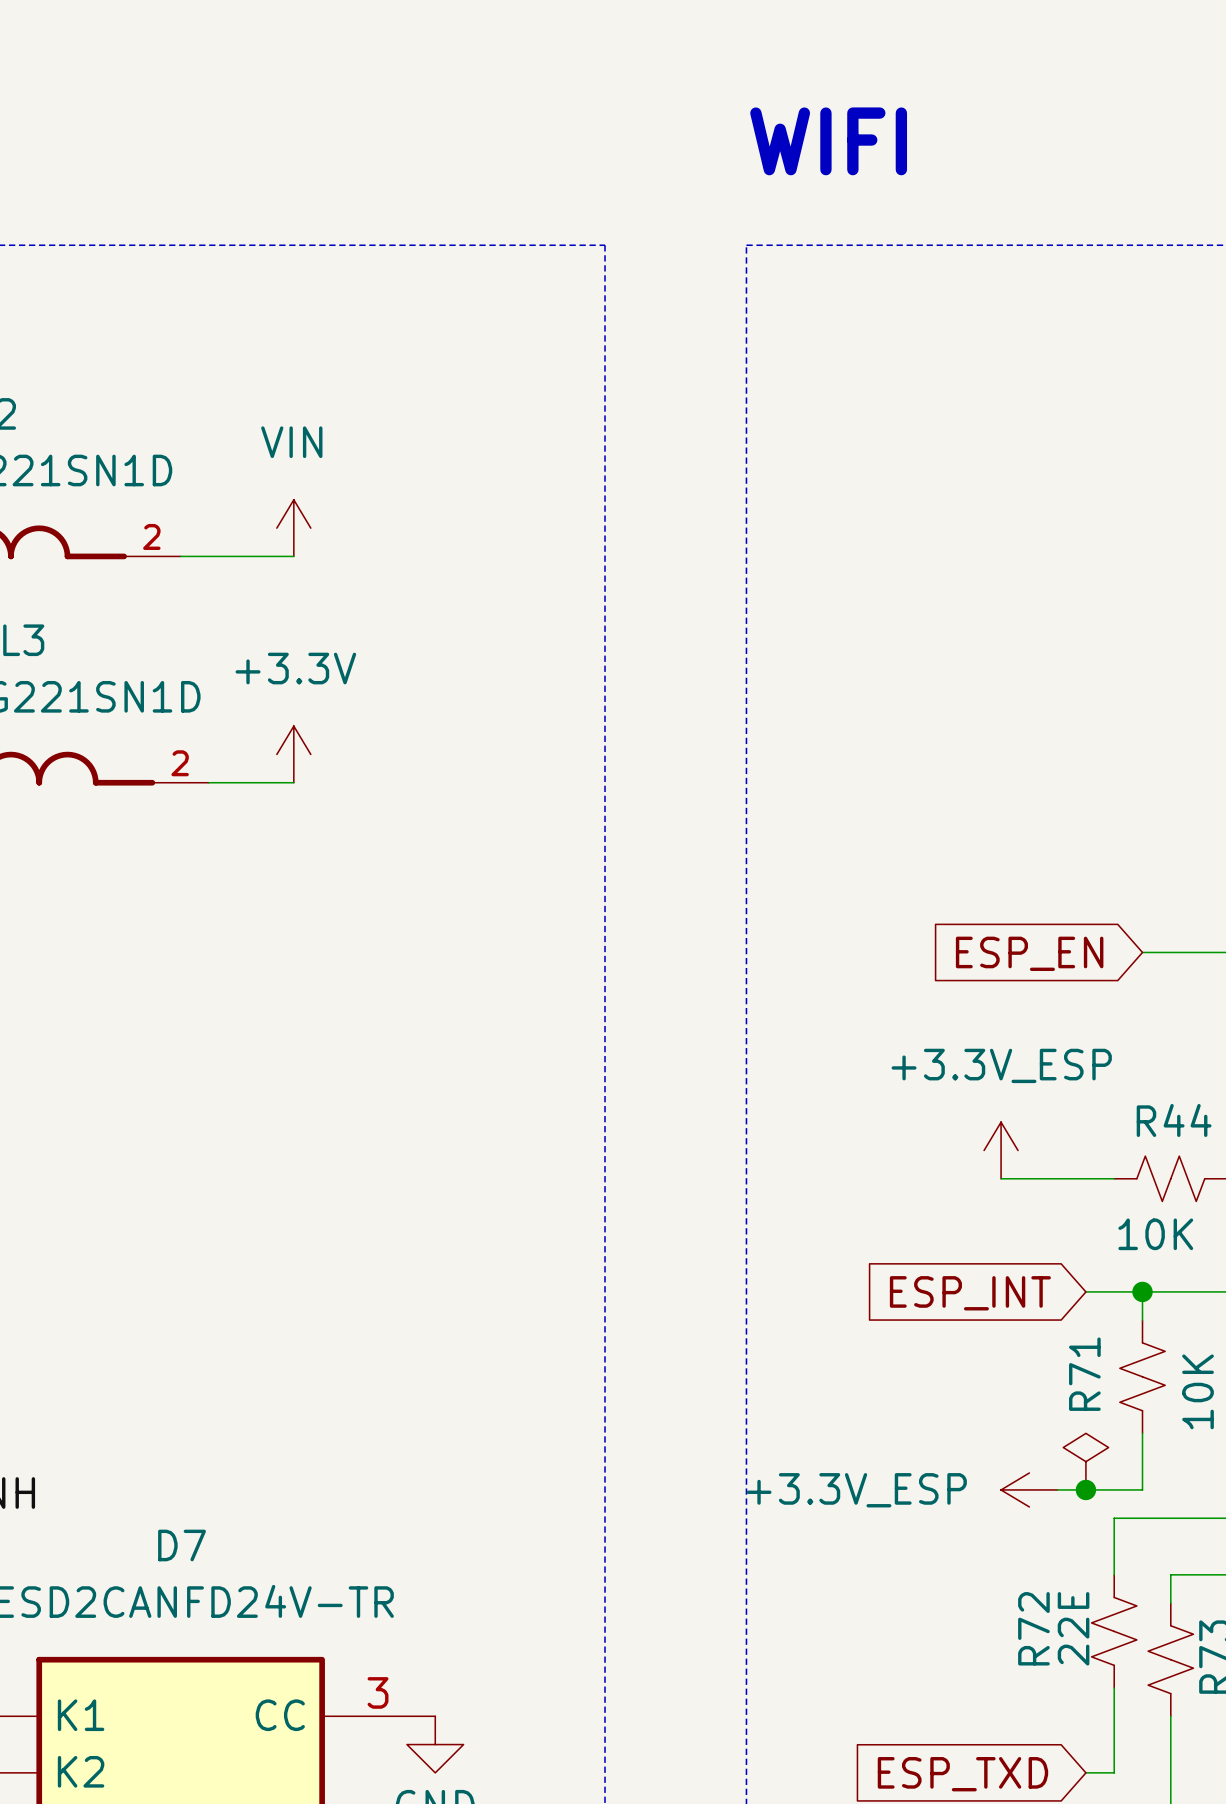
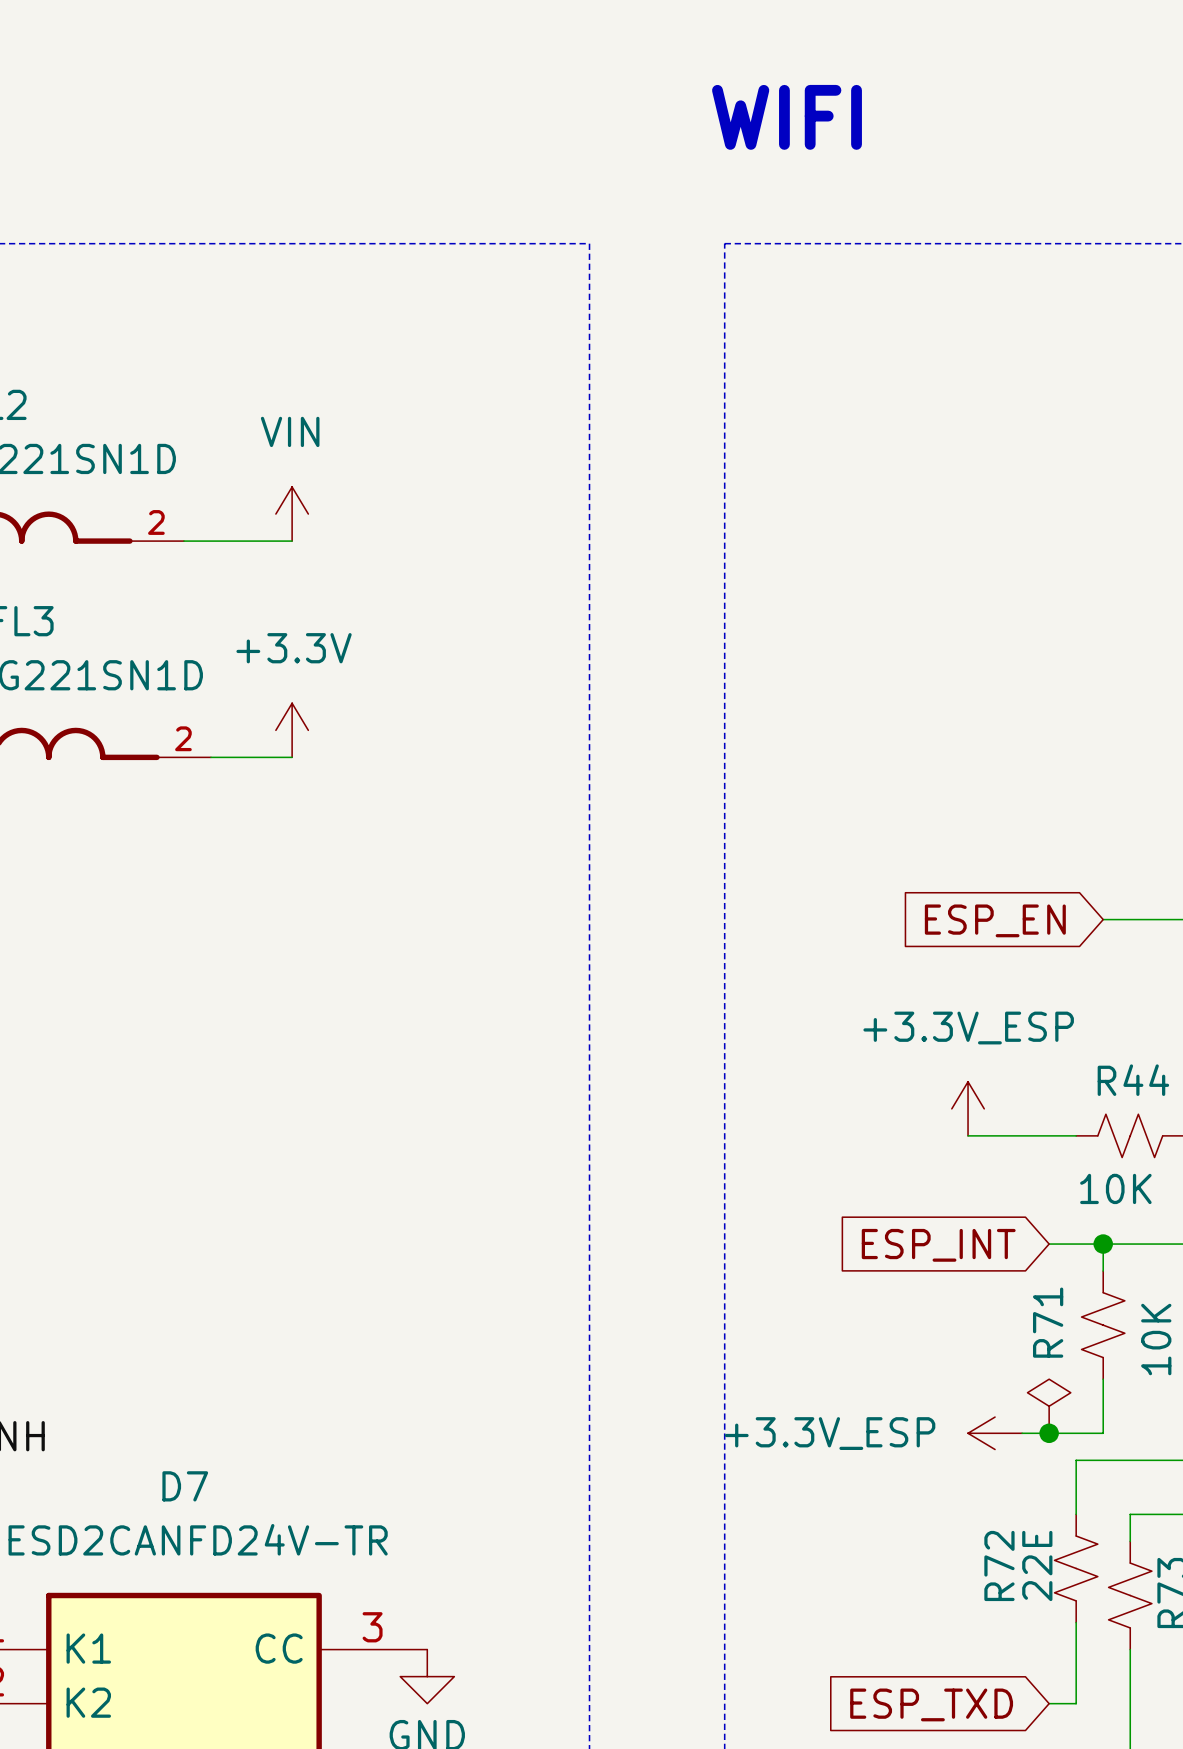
text position: WIFI (828, 141) -> WIFI (787, 117)

